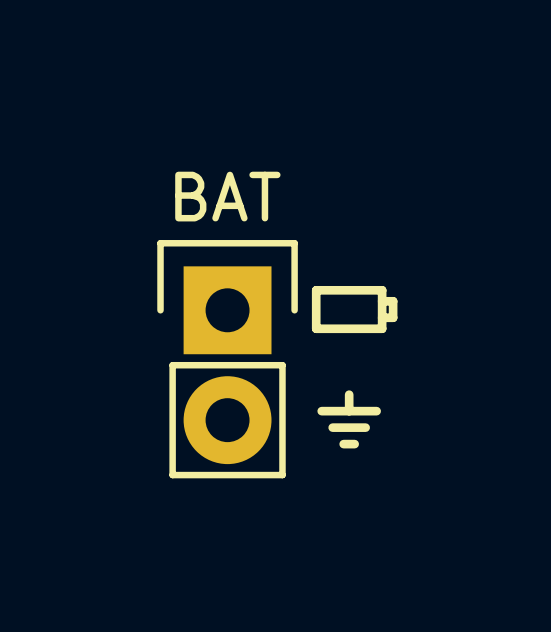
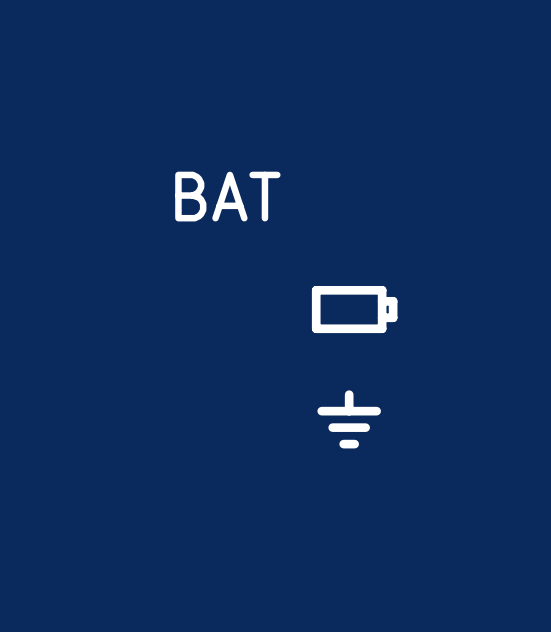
part: (227, 359) -> none

